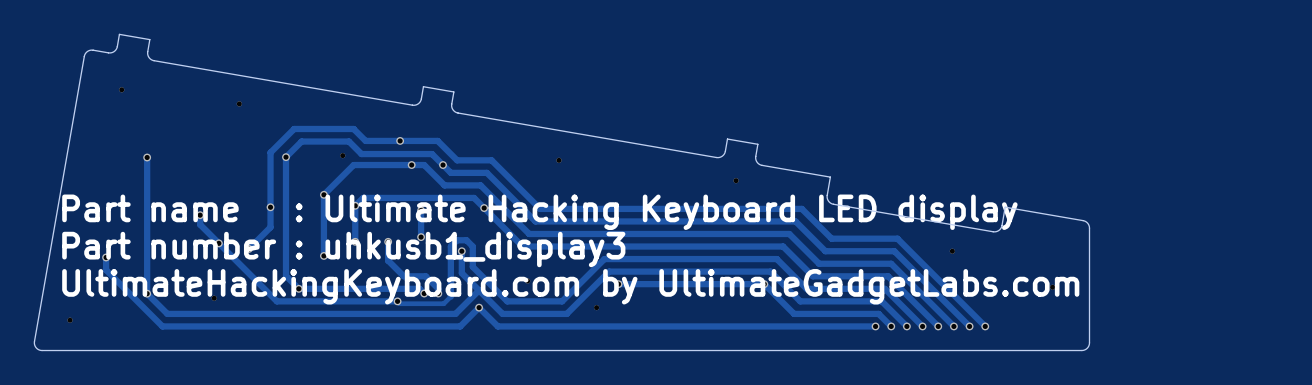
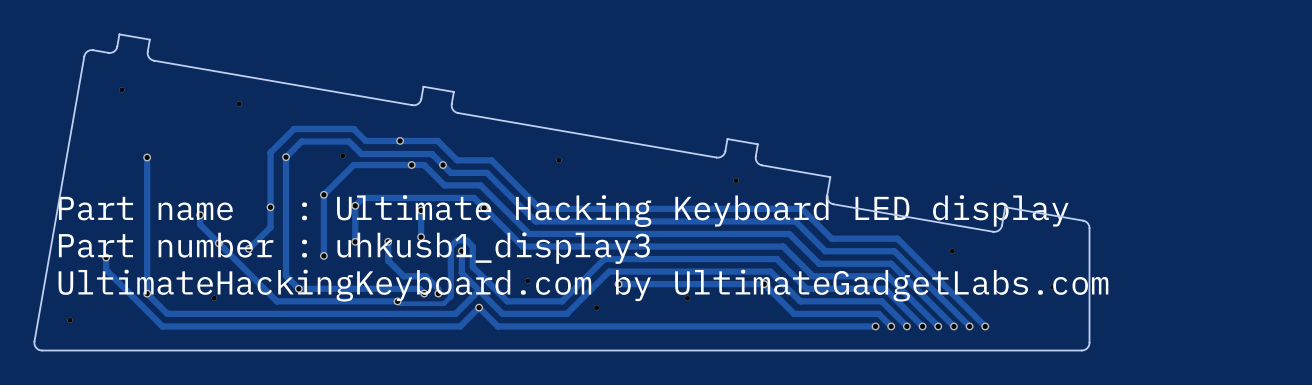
part: none -> (687, 298)

